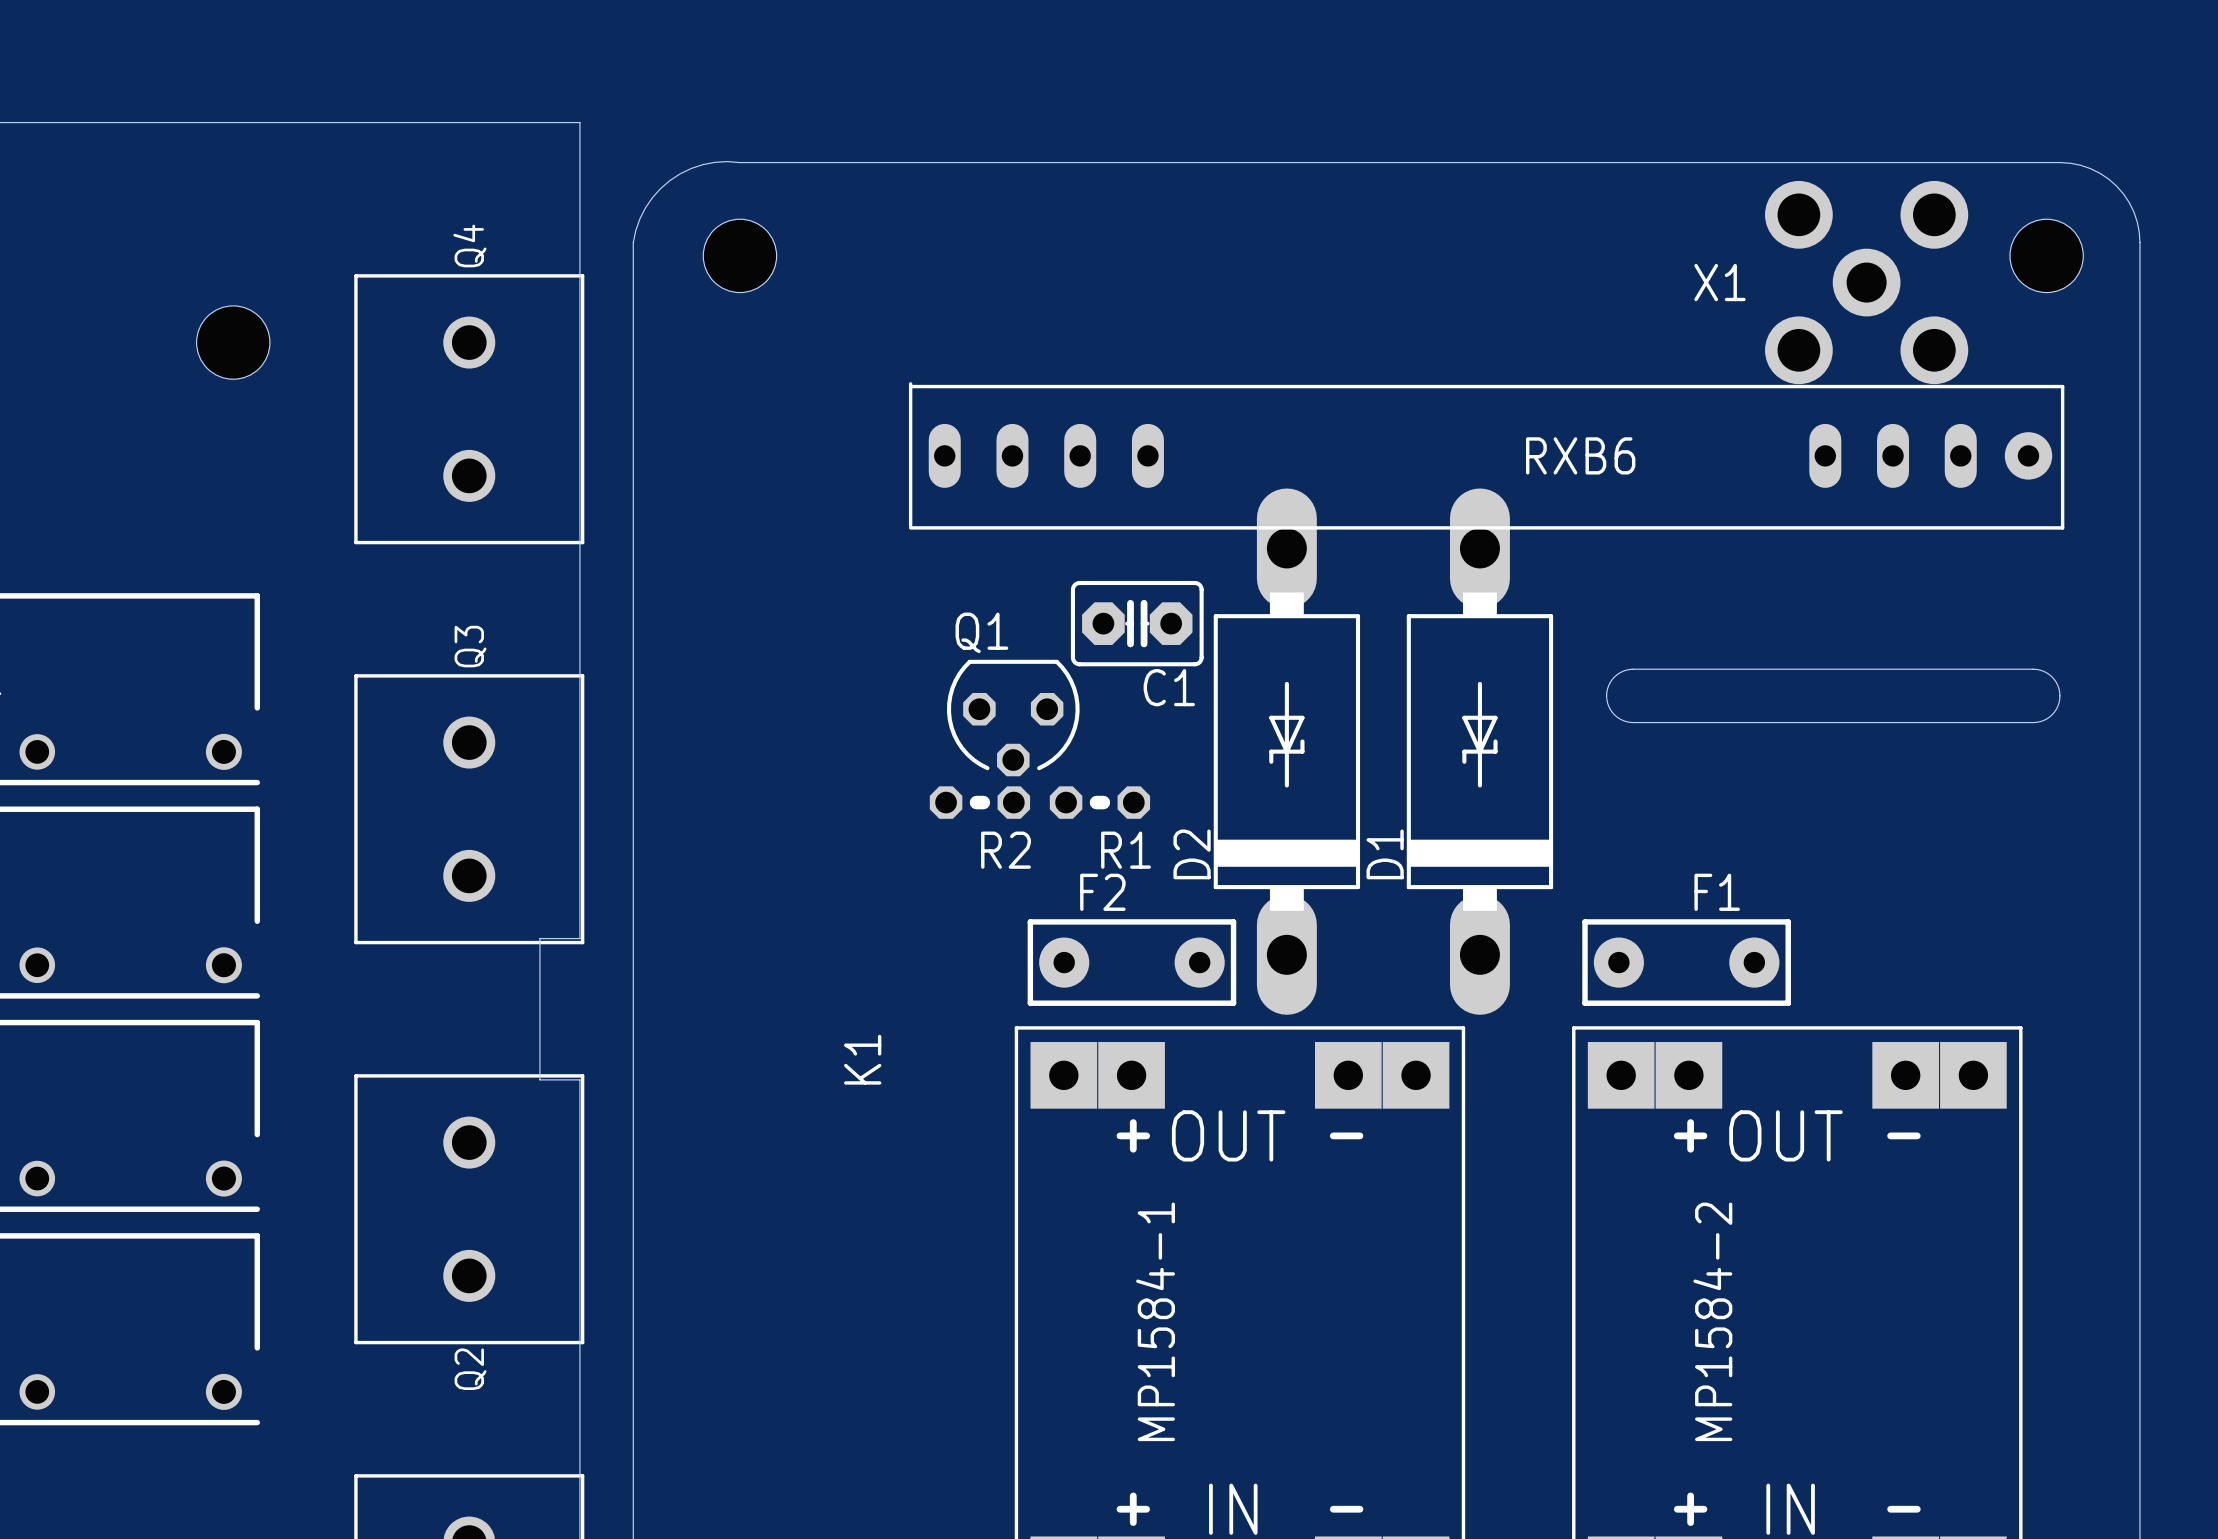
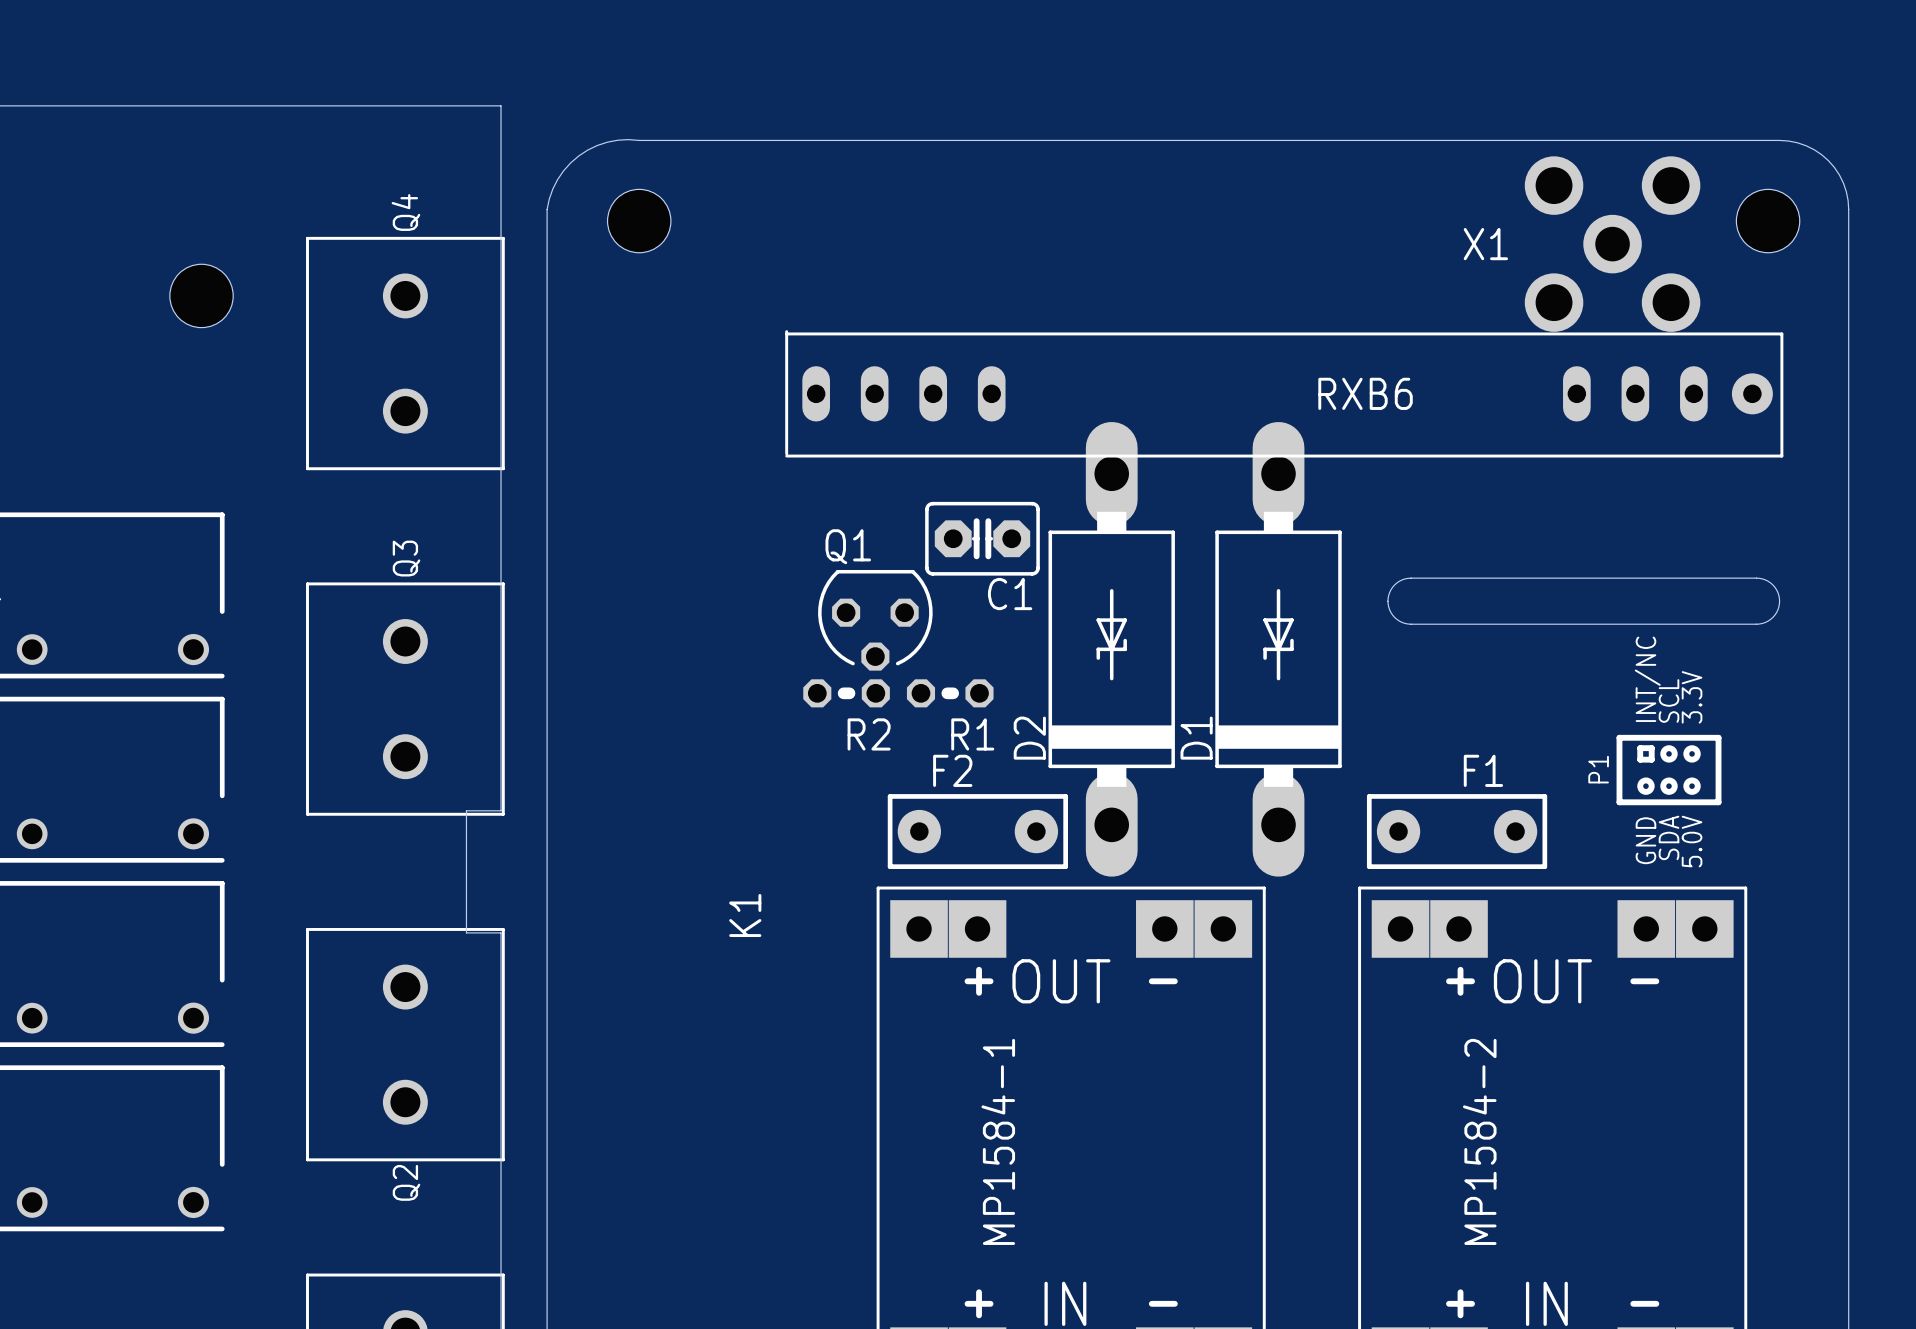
text: none -> INT/NC (1647, 679)
text: none -> 3.3V (1692, 697)
text: none -> SCL (1669, 700)
line: none -> (1619, 737) (1718, 737) (1718, 802) (1619, 802) (1619, 737)
drawing: none -> [1637, 745, 1701, 795]
line: none -> (1640, 748) (1651, 748) (1651, 759) (1640, 759) (1640, 748)
text: none -> P1 (1598, 769)
text: none -> SDA (1669, 837)
text: none -> GND (1645, 840)
text: none -> 5.0V (1692, 841)

